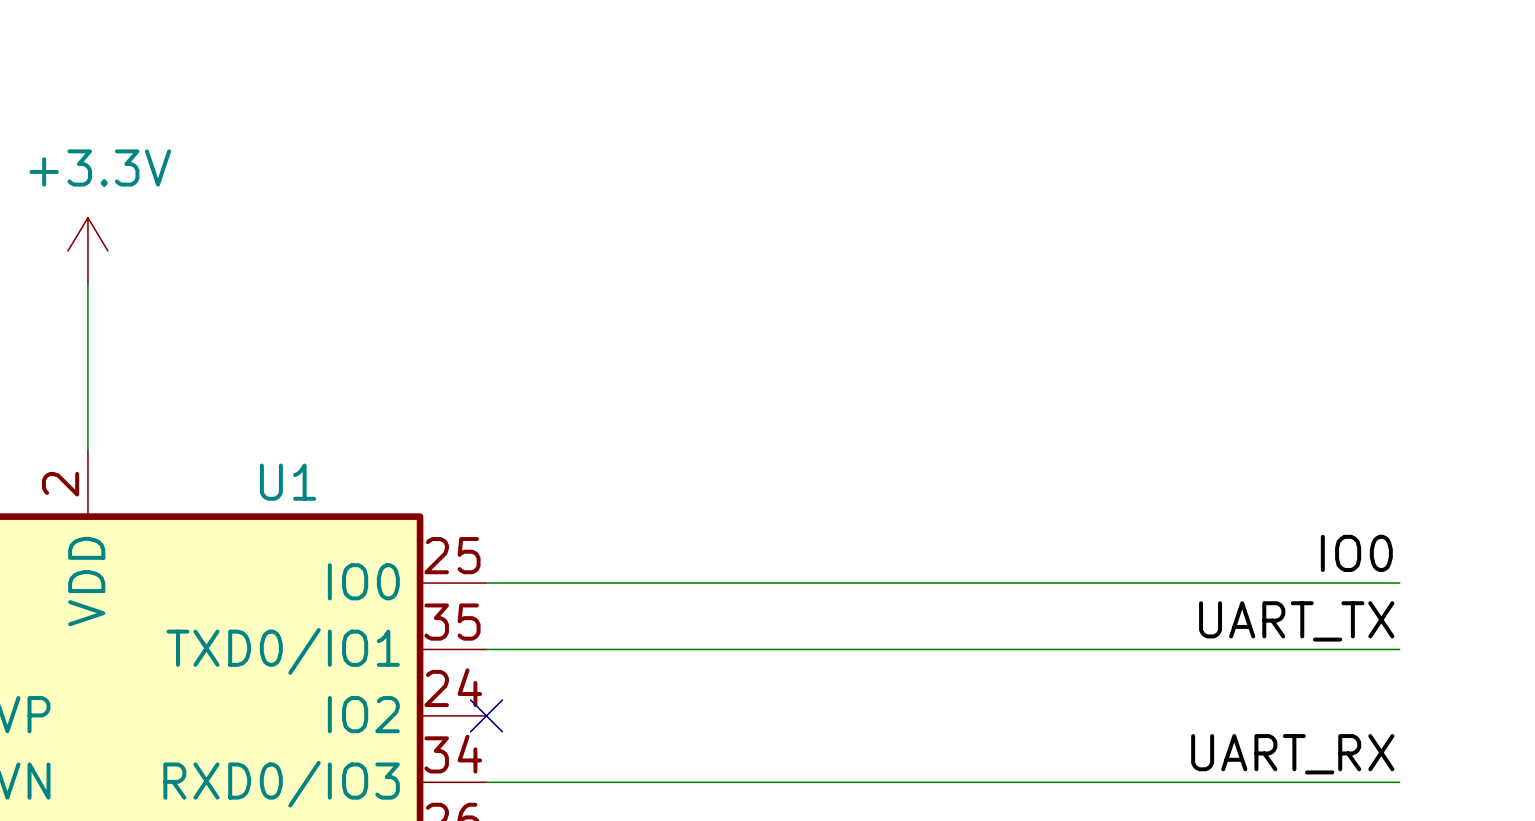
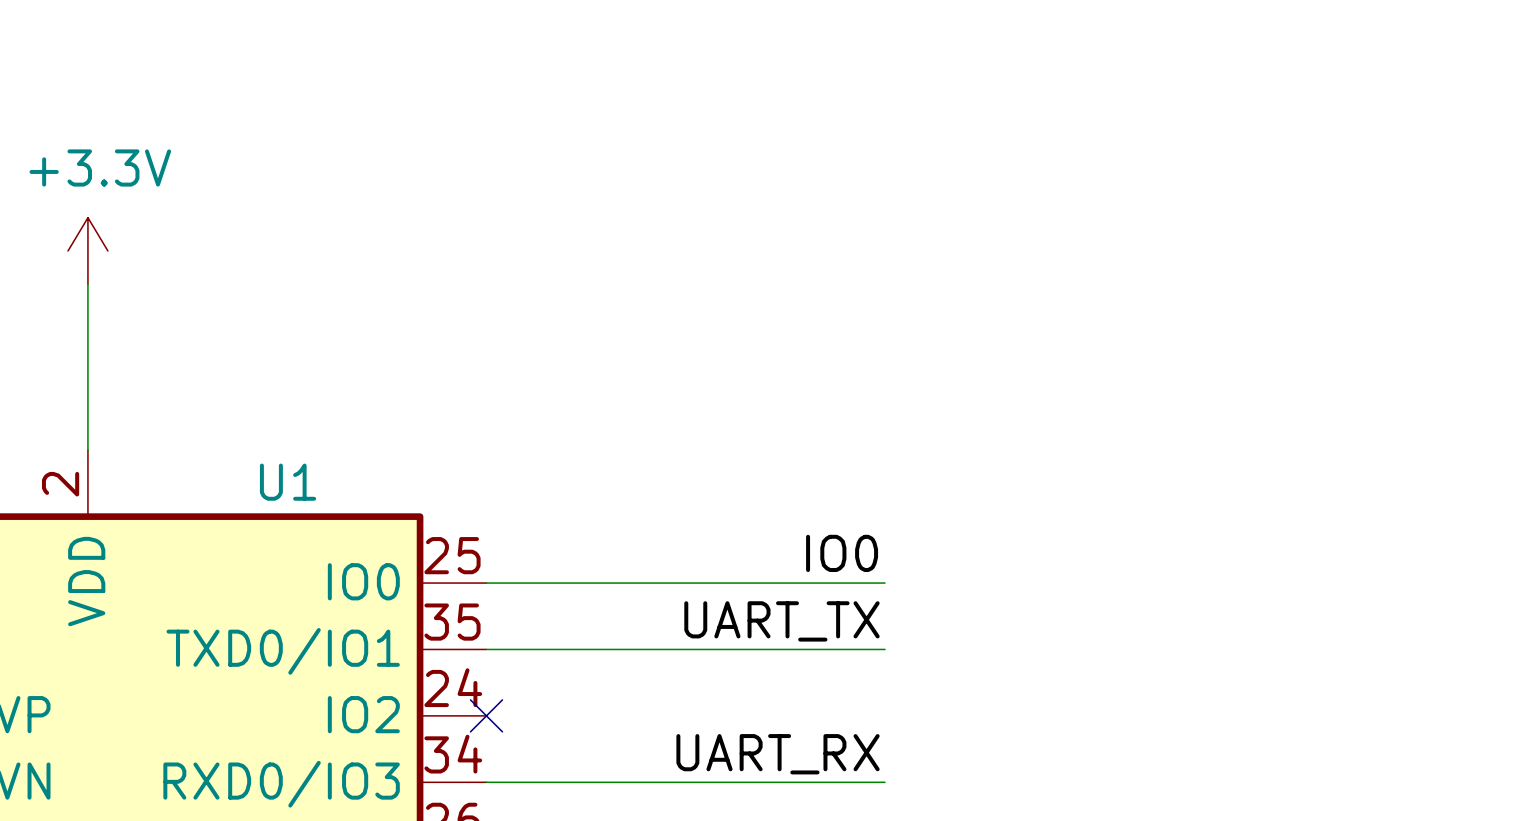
label position: IO0 (1356, 553) -> IO0 (842, 553)
wire: (885, 583) (1399, 583) -> none
label position: UART_TX (1296, 621) -> UART_TX (781, 621)
wire: (885, 649) (1399, 649) -> none
label position: UART_RX (1292, 754) -> UART_RX (778, 754)
wire: (885, 782) (1399, 782) -> none

